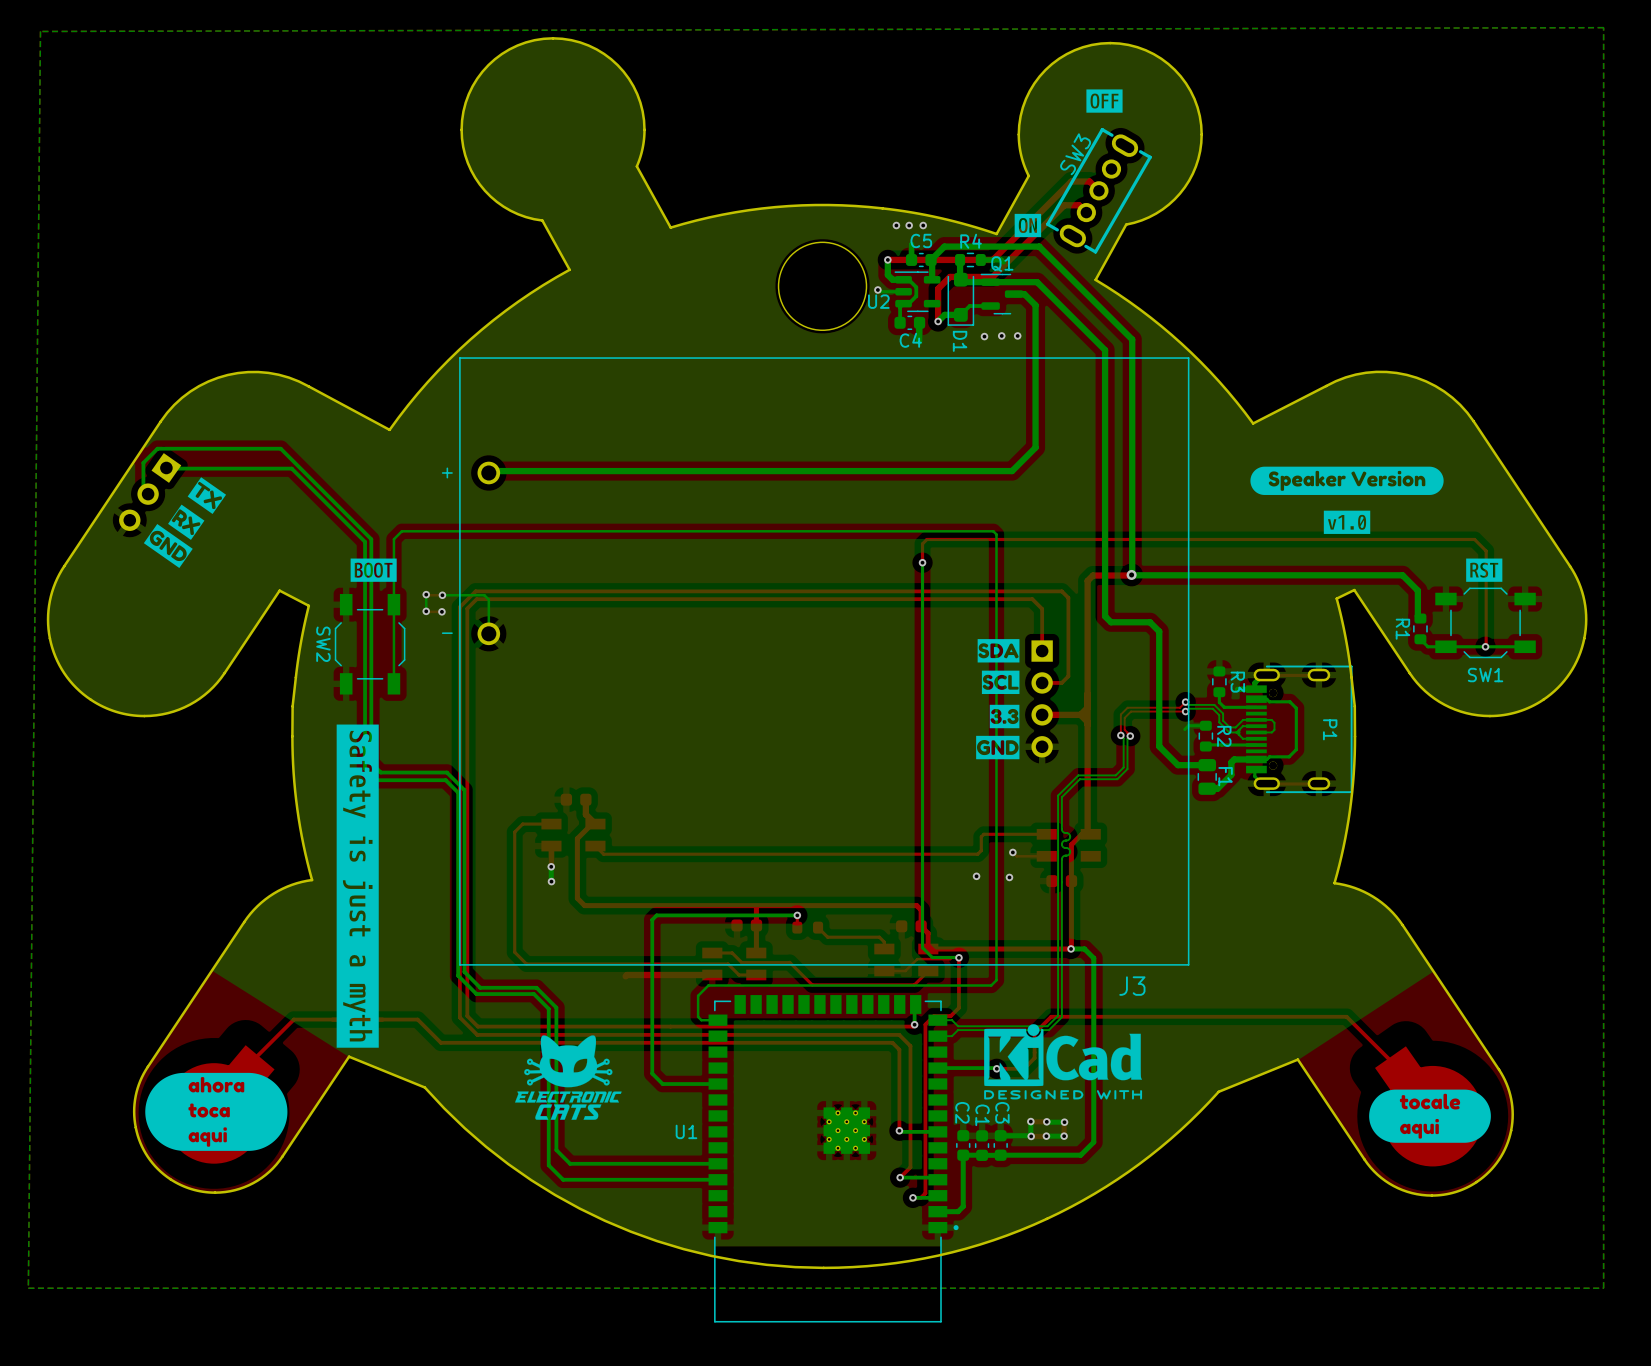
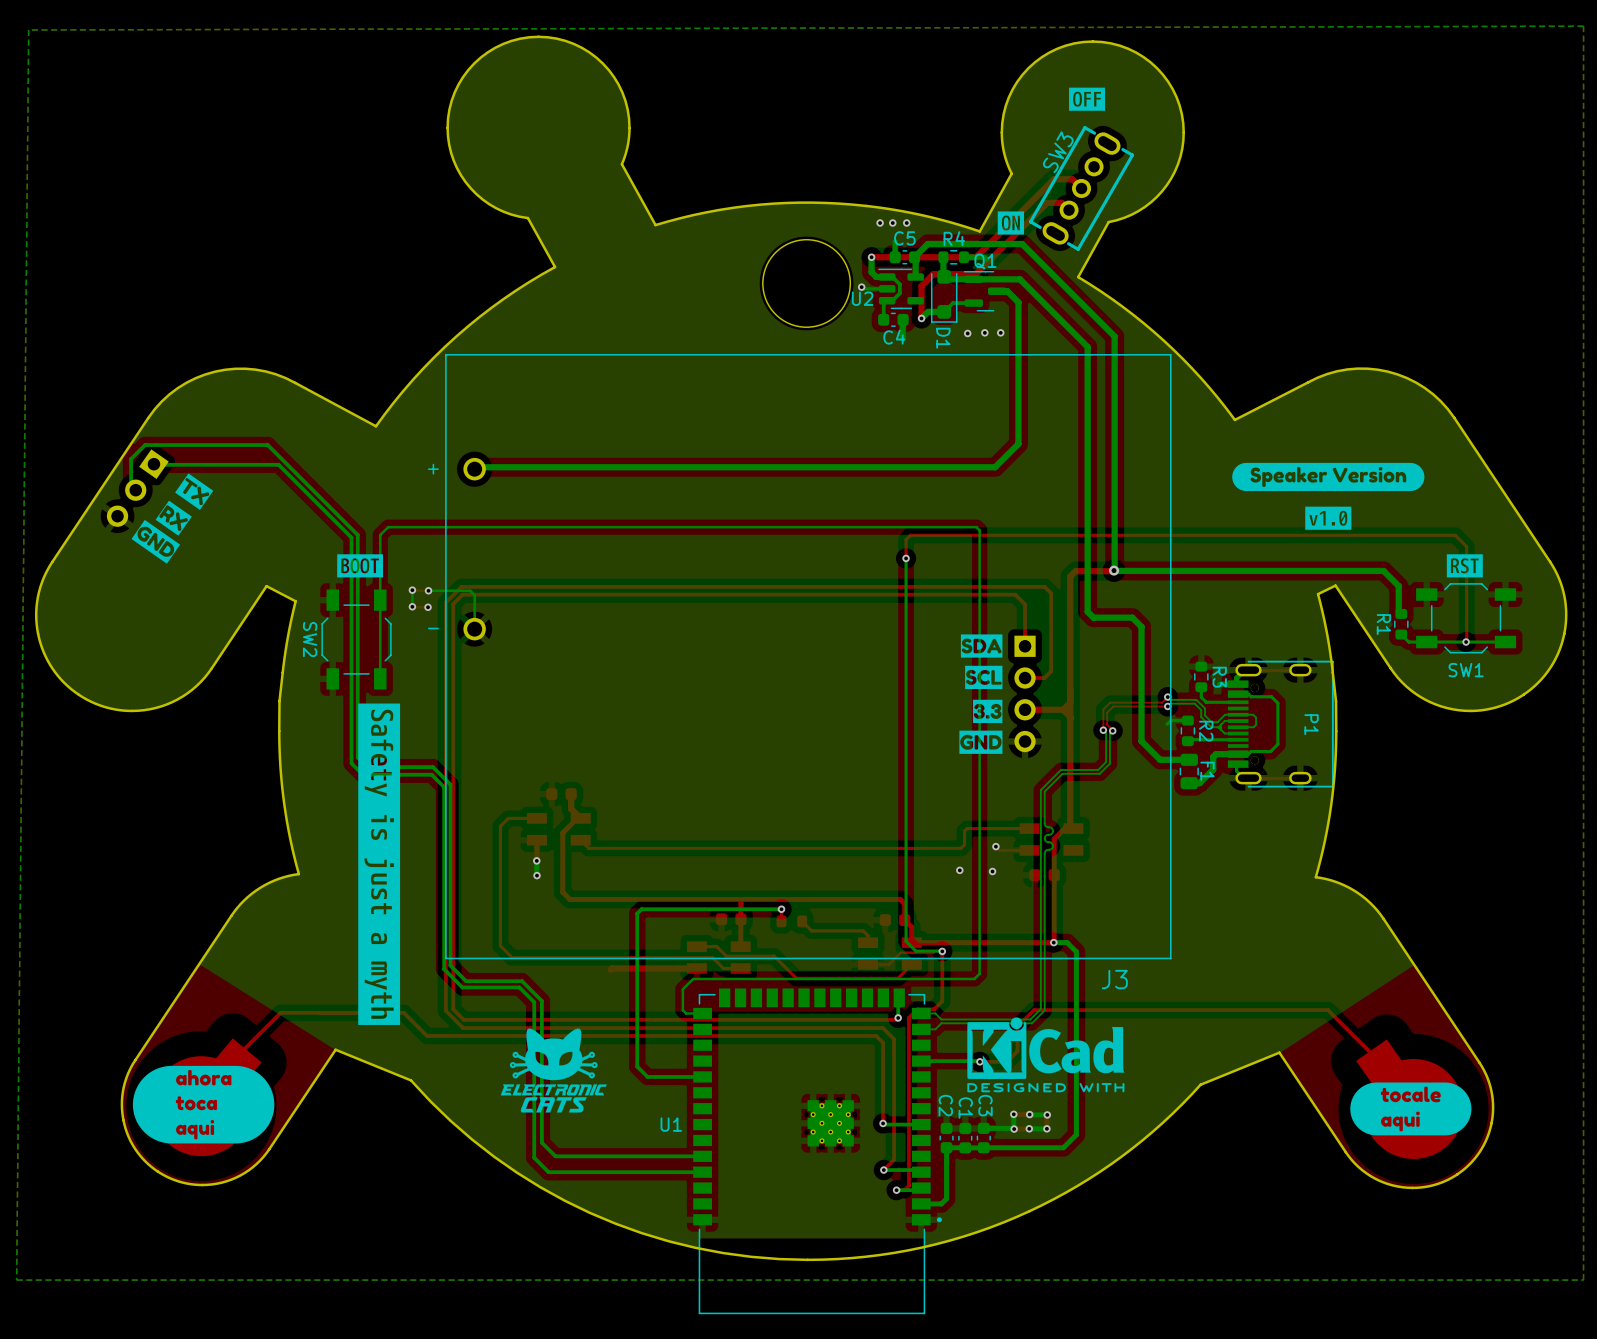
drawing position: (357, 886) -> (379, 864)

